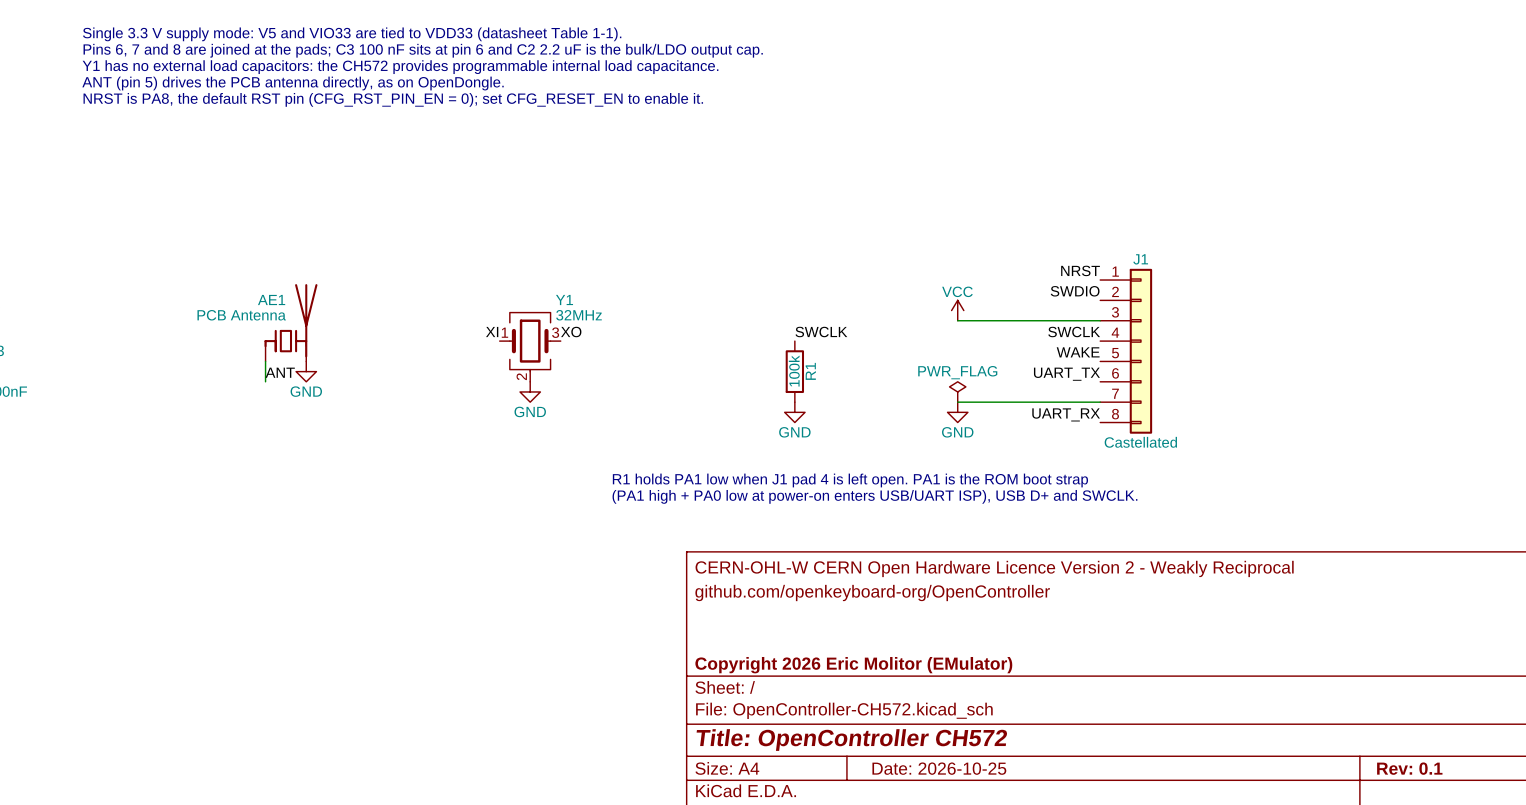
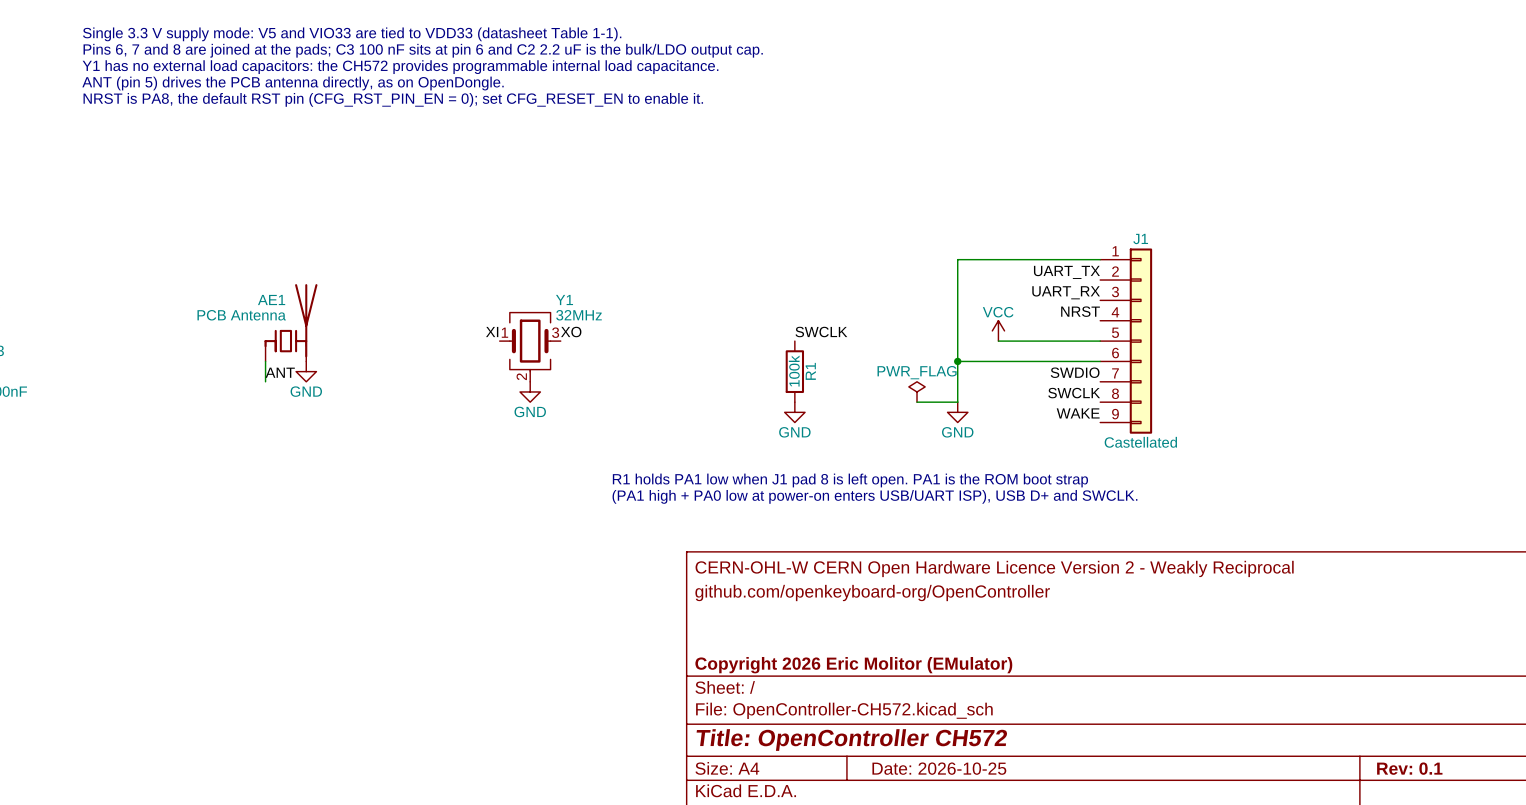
wire: none -> (1100, 259) (957, 259) (957, 402) (917, 402)
J1 symbol: [1100, 268, 1153, 434] -> [1100, 248, 1153, 434]
label: NRST (1080, 270) -> UART_TX (1066, 272)
label: SWDIO (1075, 291) -> UART_RX (1066, 292)
power symbol position: VCC (957, 310) -> VCC (998, 330)
label: none -> NRST (1080, 311)
wire: (957, 320) (1100, 320) -> none
label position: SWCLK (1074, 332) -> SWCLK (1074, 393)
wire: none -> (998, 341) (1100, 341)
label: WAKE (1078, 352) -> none
junction: none -> (957, 361)
label: UART_TX (1066, 374) -> SWDIO (1075, 372)
power symbol position: PWR_FLAG (957, 391) -> PWR_FLAG (917, 391)
wire: (957, 402) (1100, 402) -> (957, 361) (1100, 361)
label: UART_RX (1066, 414) -> WAKE (1078, 413)
text: R1 holds PA1 low when J1 pad 4 is left open. PA1 is the ROM boot strap (850, 480) -> R1 holds PA1 low when J1 pad 8 is left open. PA1 is the ROM boot strap (850, 480)

